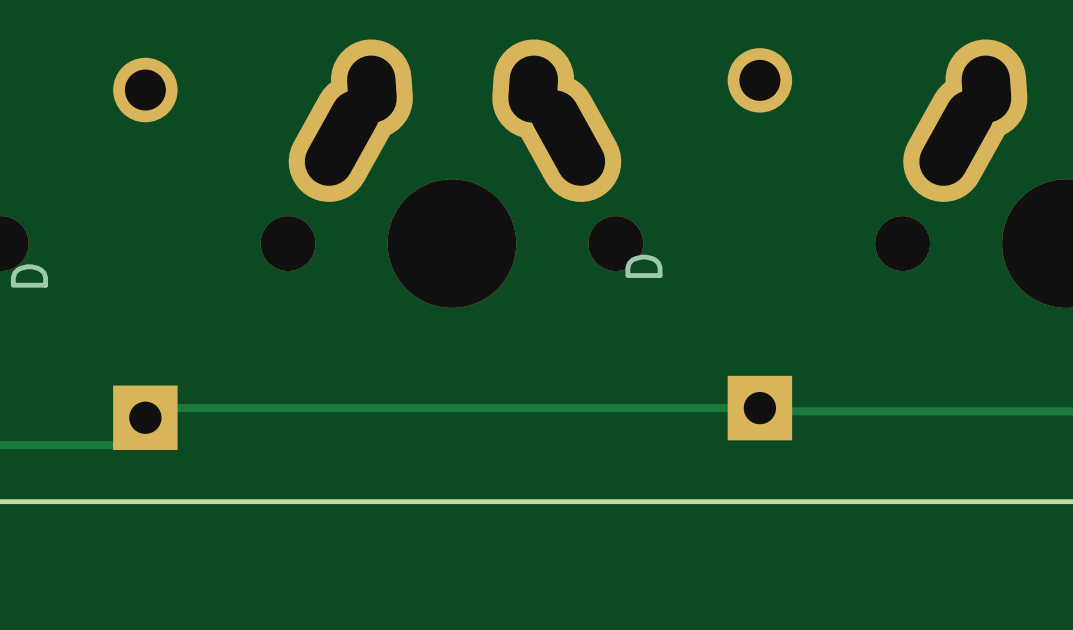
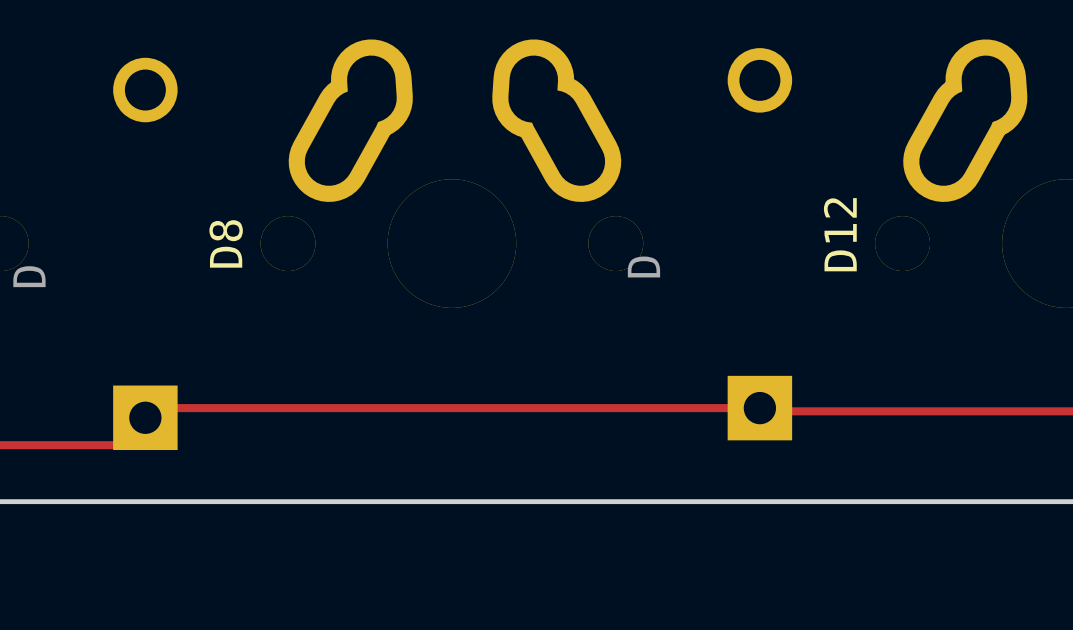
D12 name: none -> D12 (840, 234)
D8 name: none -> D8 (226, 243)

